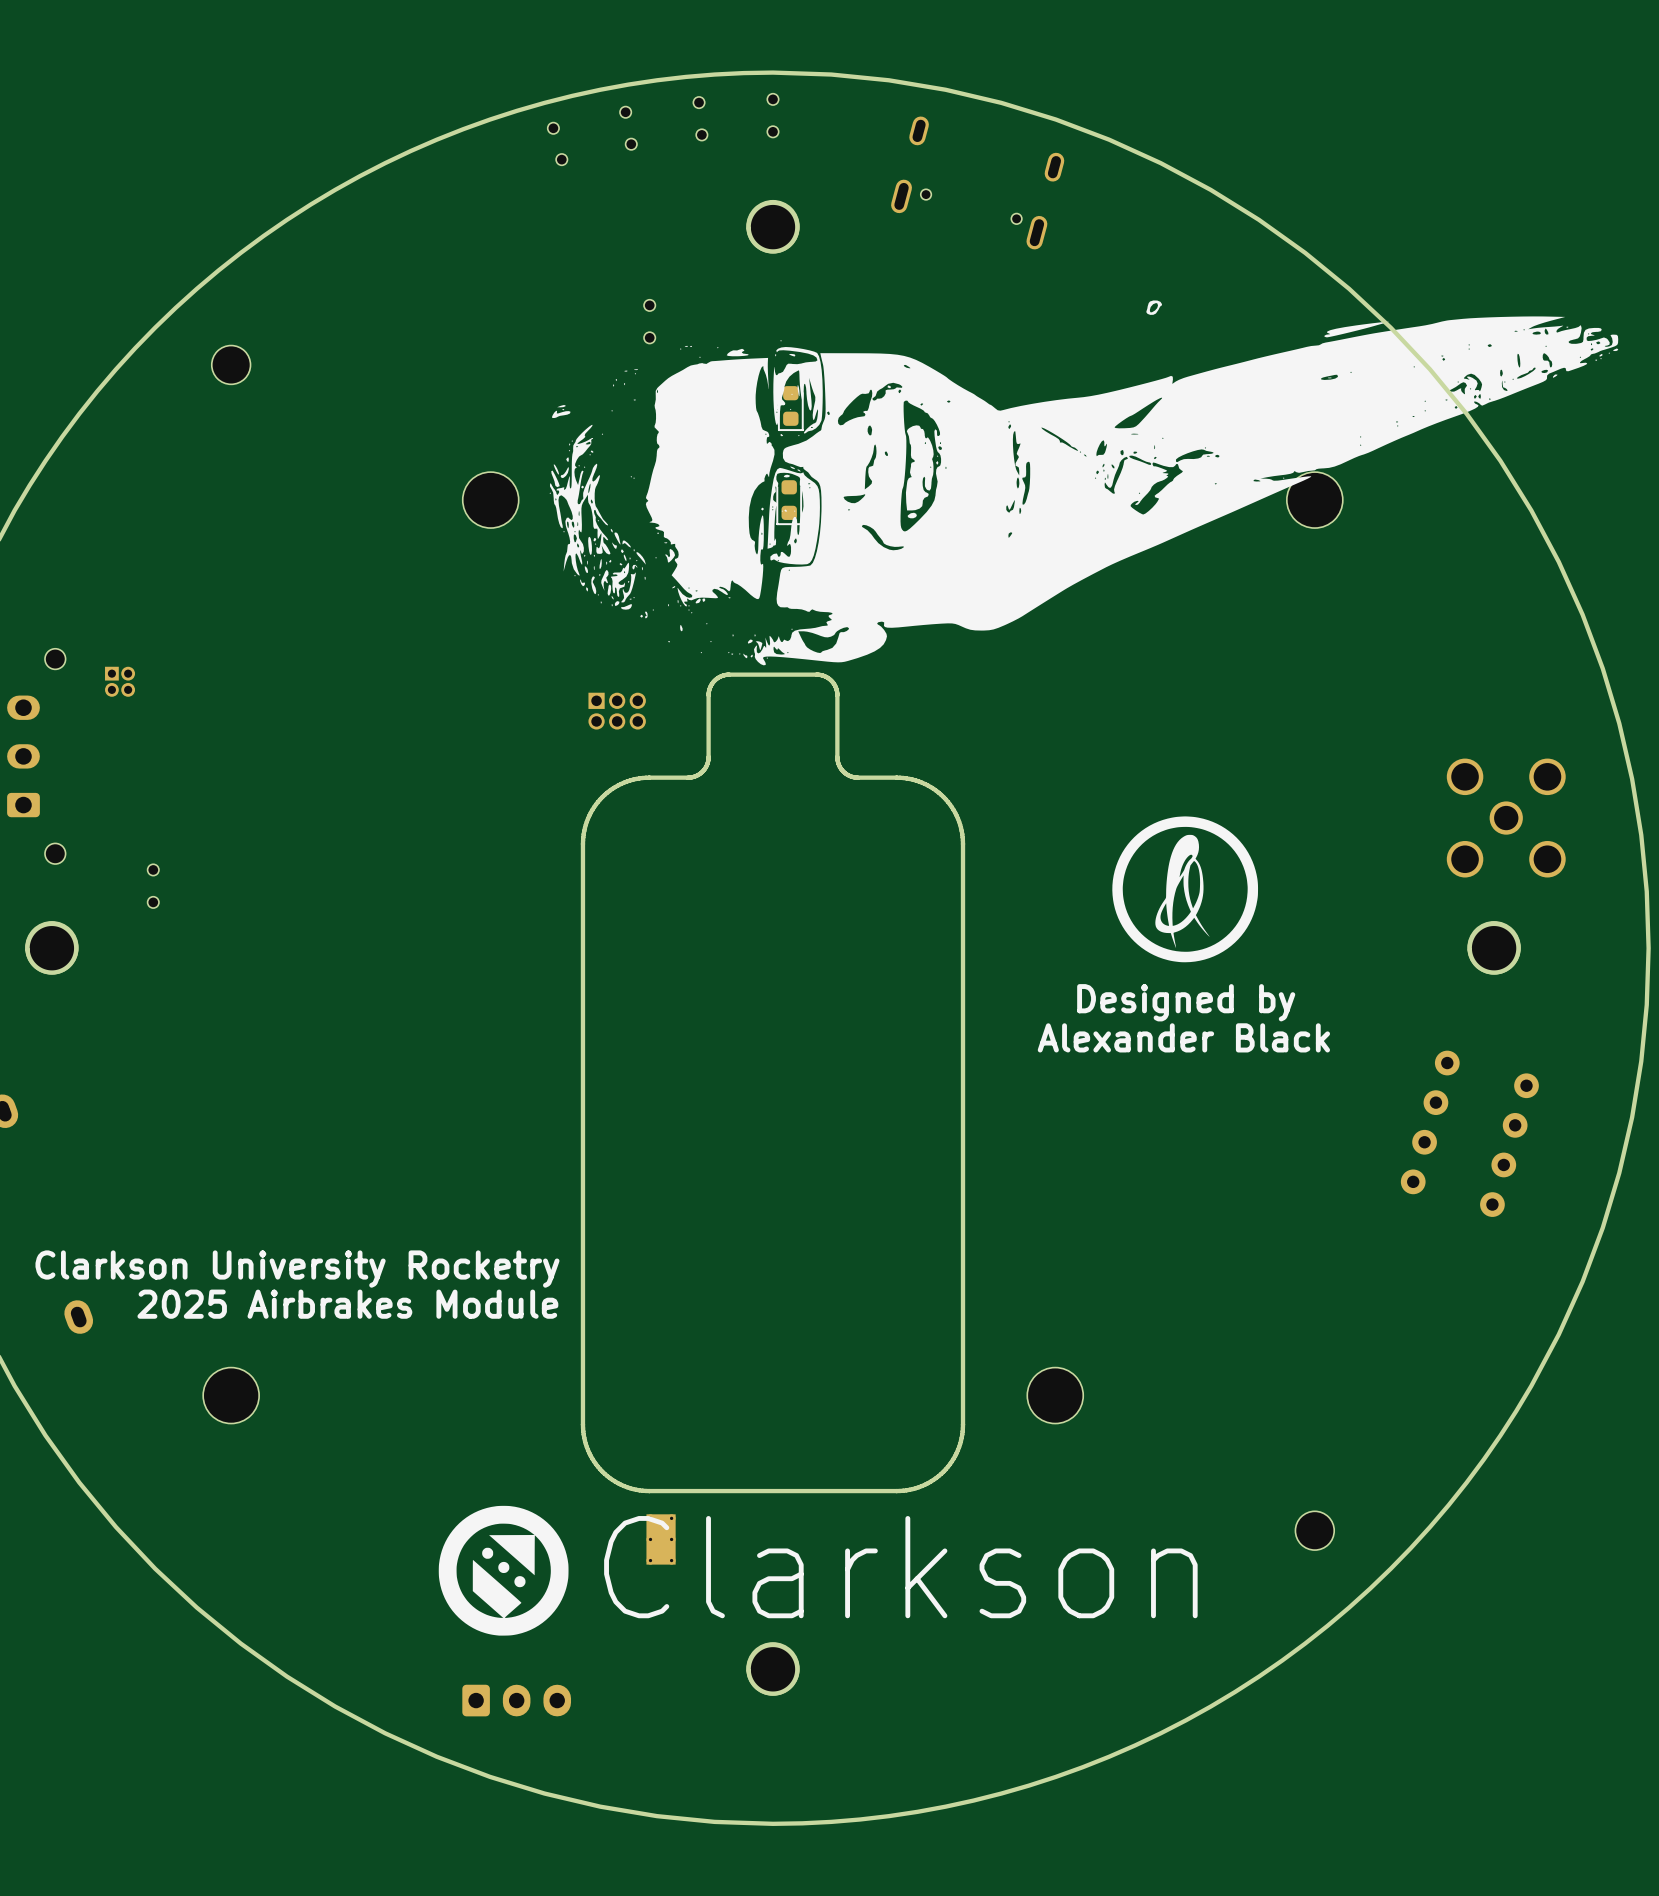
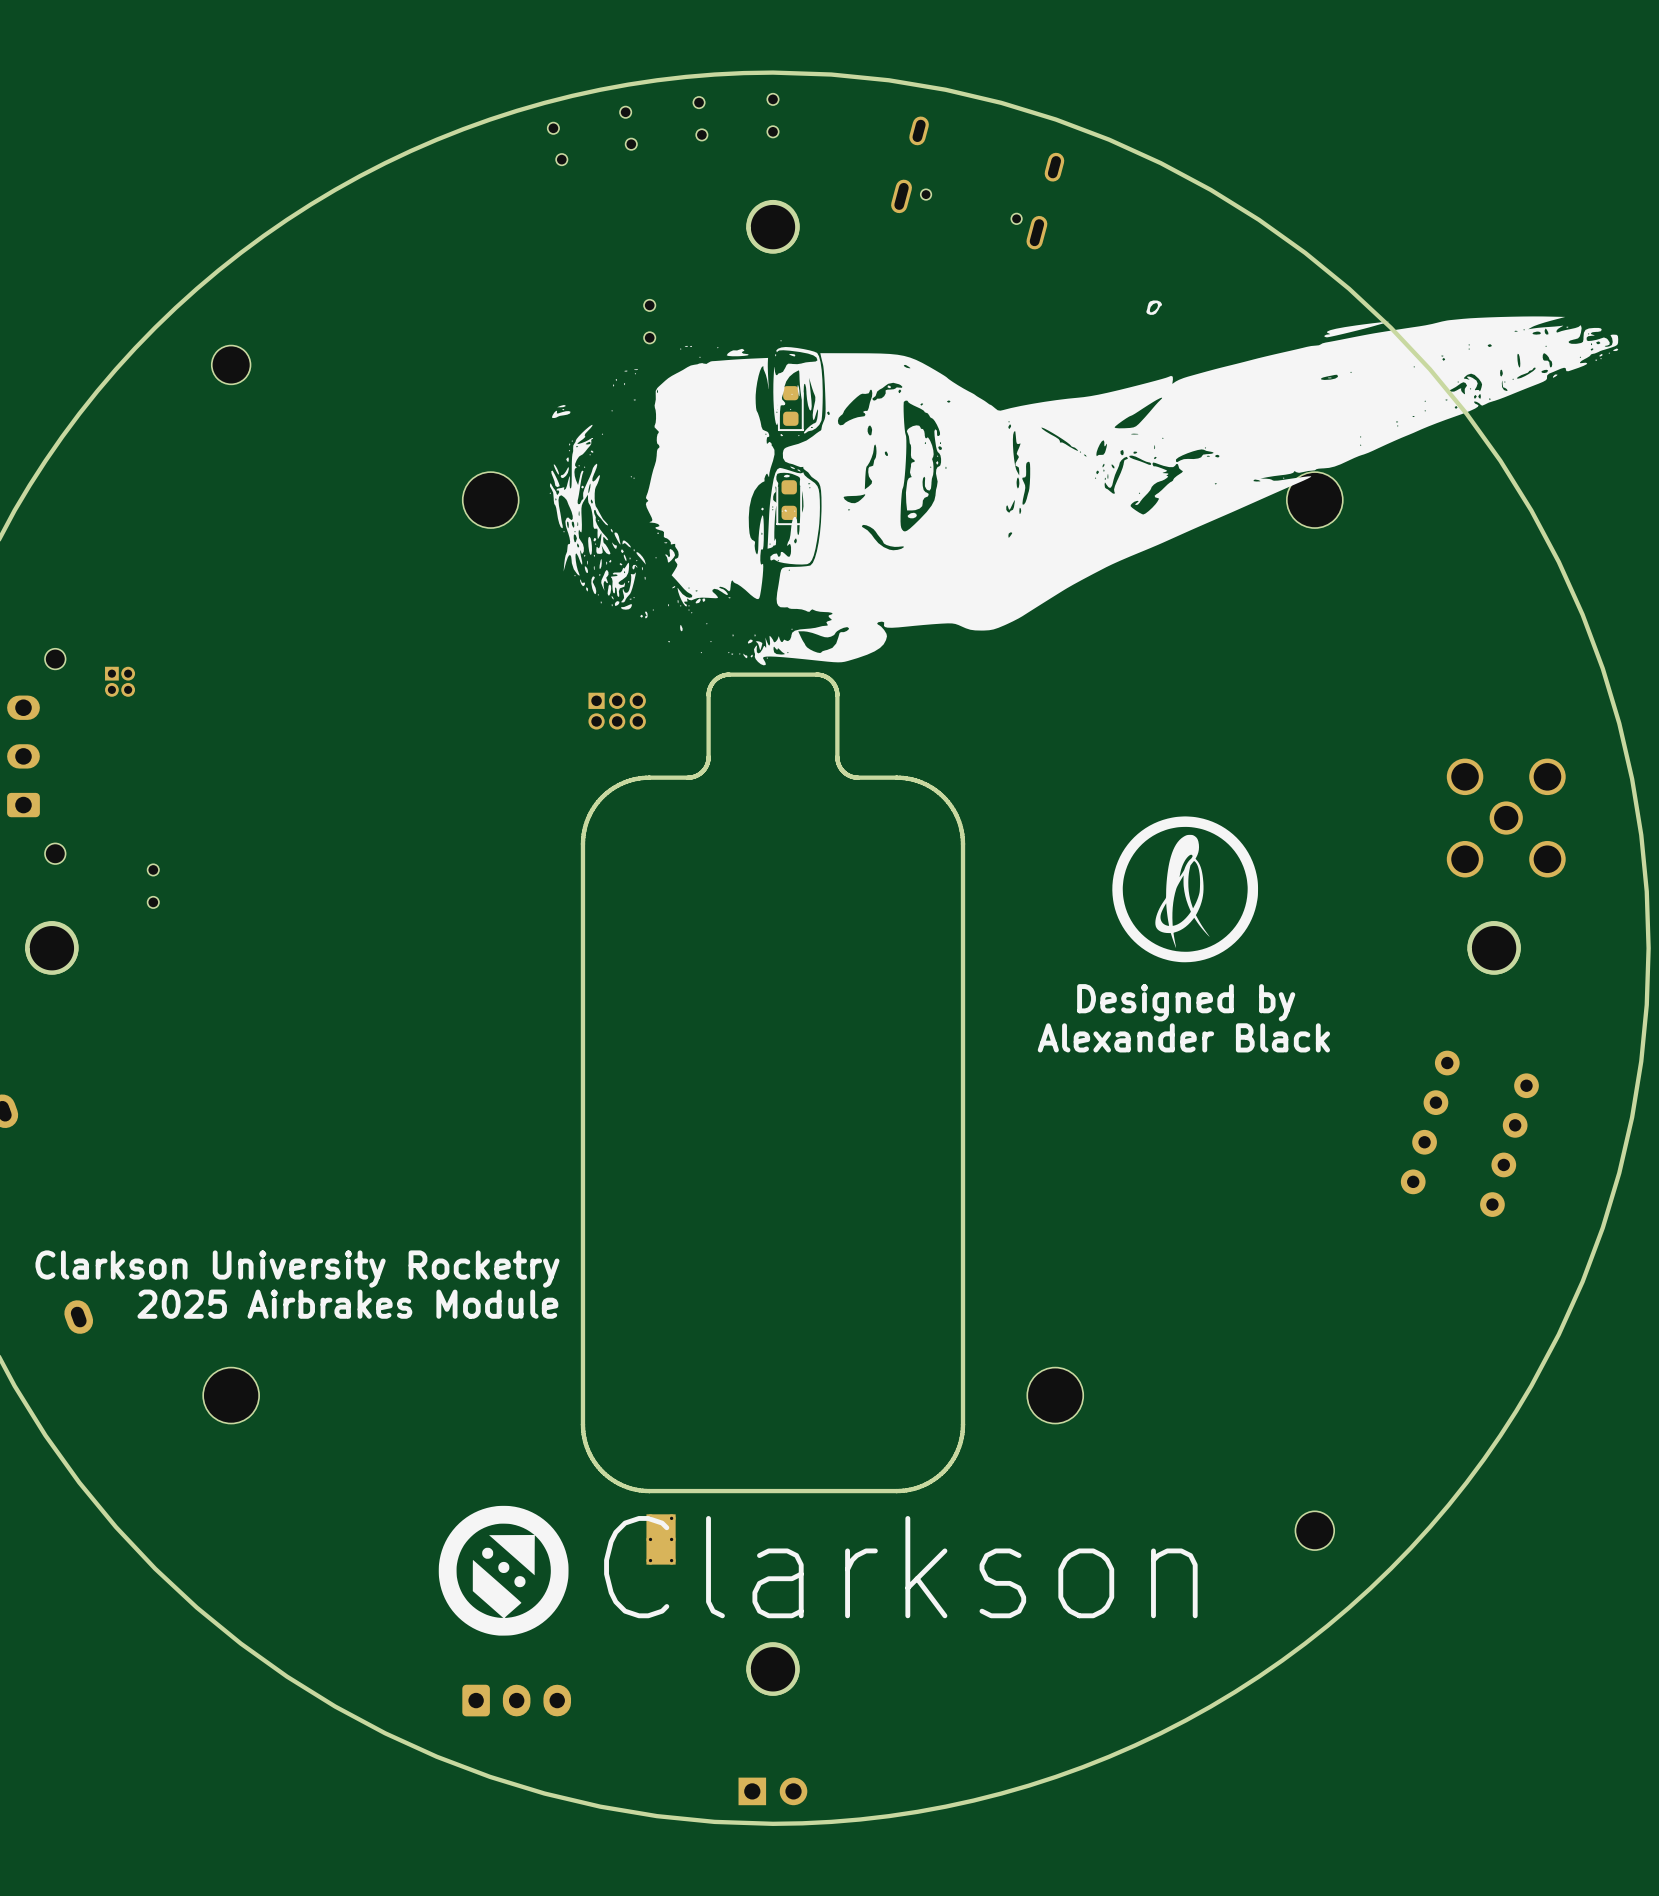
part: none -> (772, 1791)

